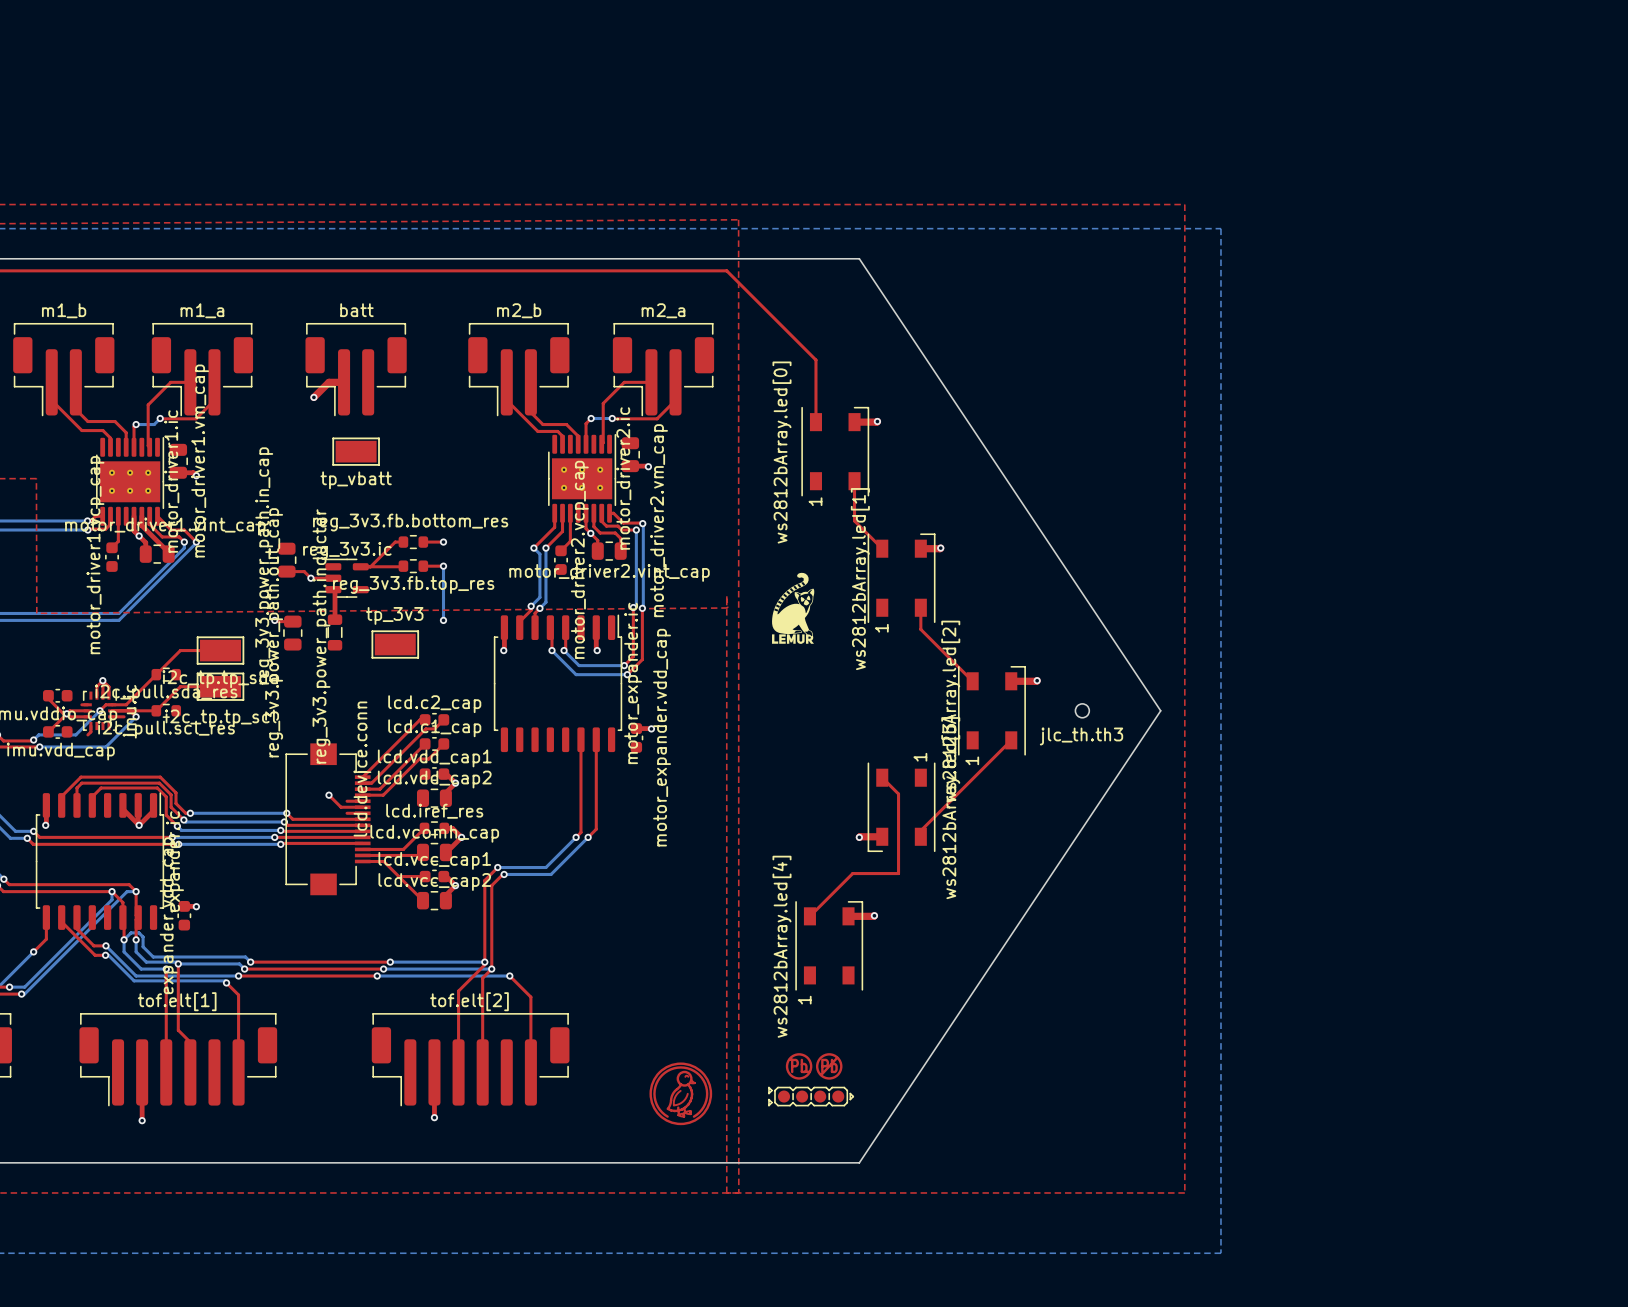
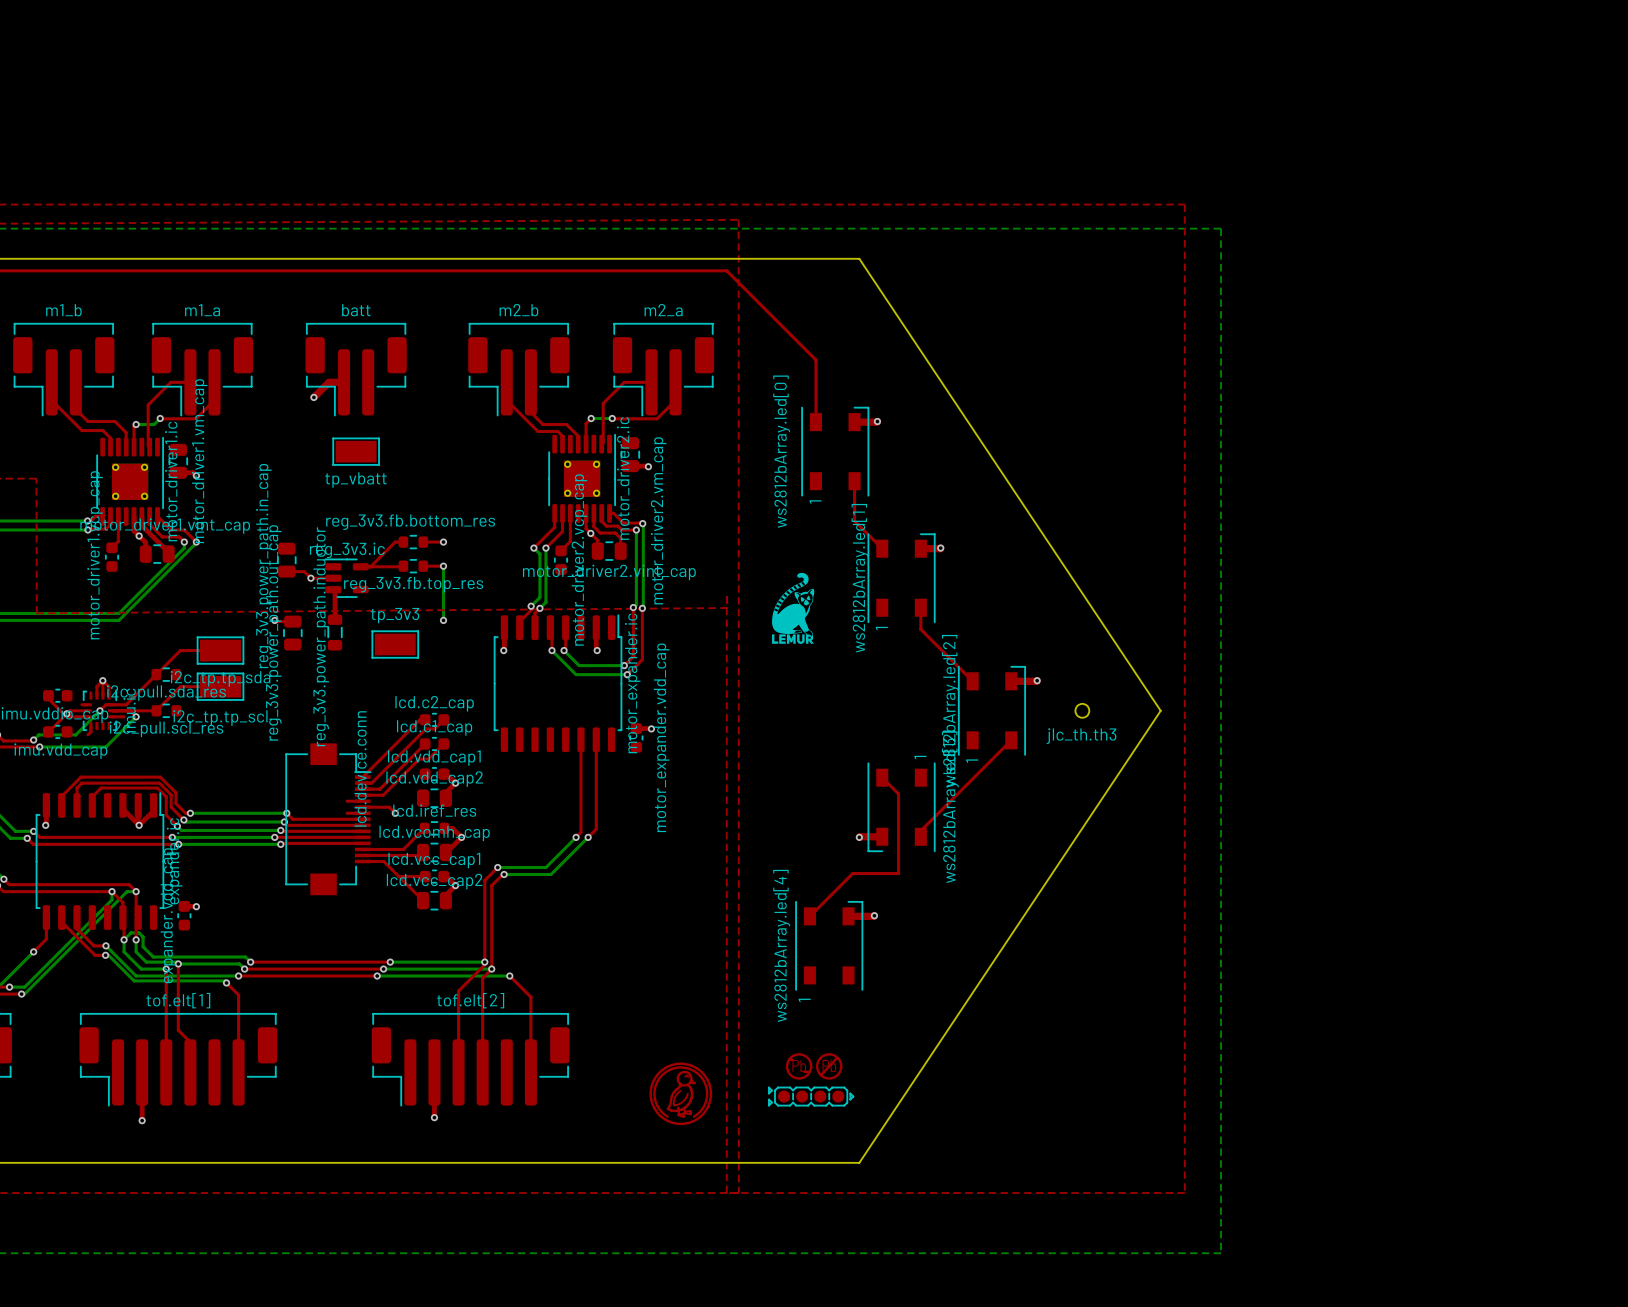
motor_driver2.ic footprint: [548, 434, 617, 523] -> [548, 434, 616, 523]
motor_driver1.ic footprint: [96, 437, 165, 526] -> [96, 437, 164, 526]
top track: (328, 795) (341, 807) (362, 807) -> (395, 813) (389, 807) (362, 807)
via position: (328, 795) -> (395, 813)

